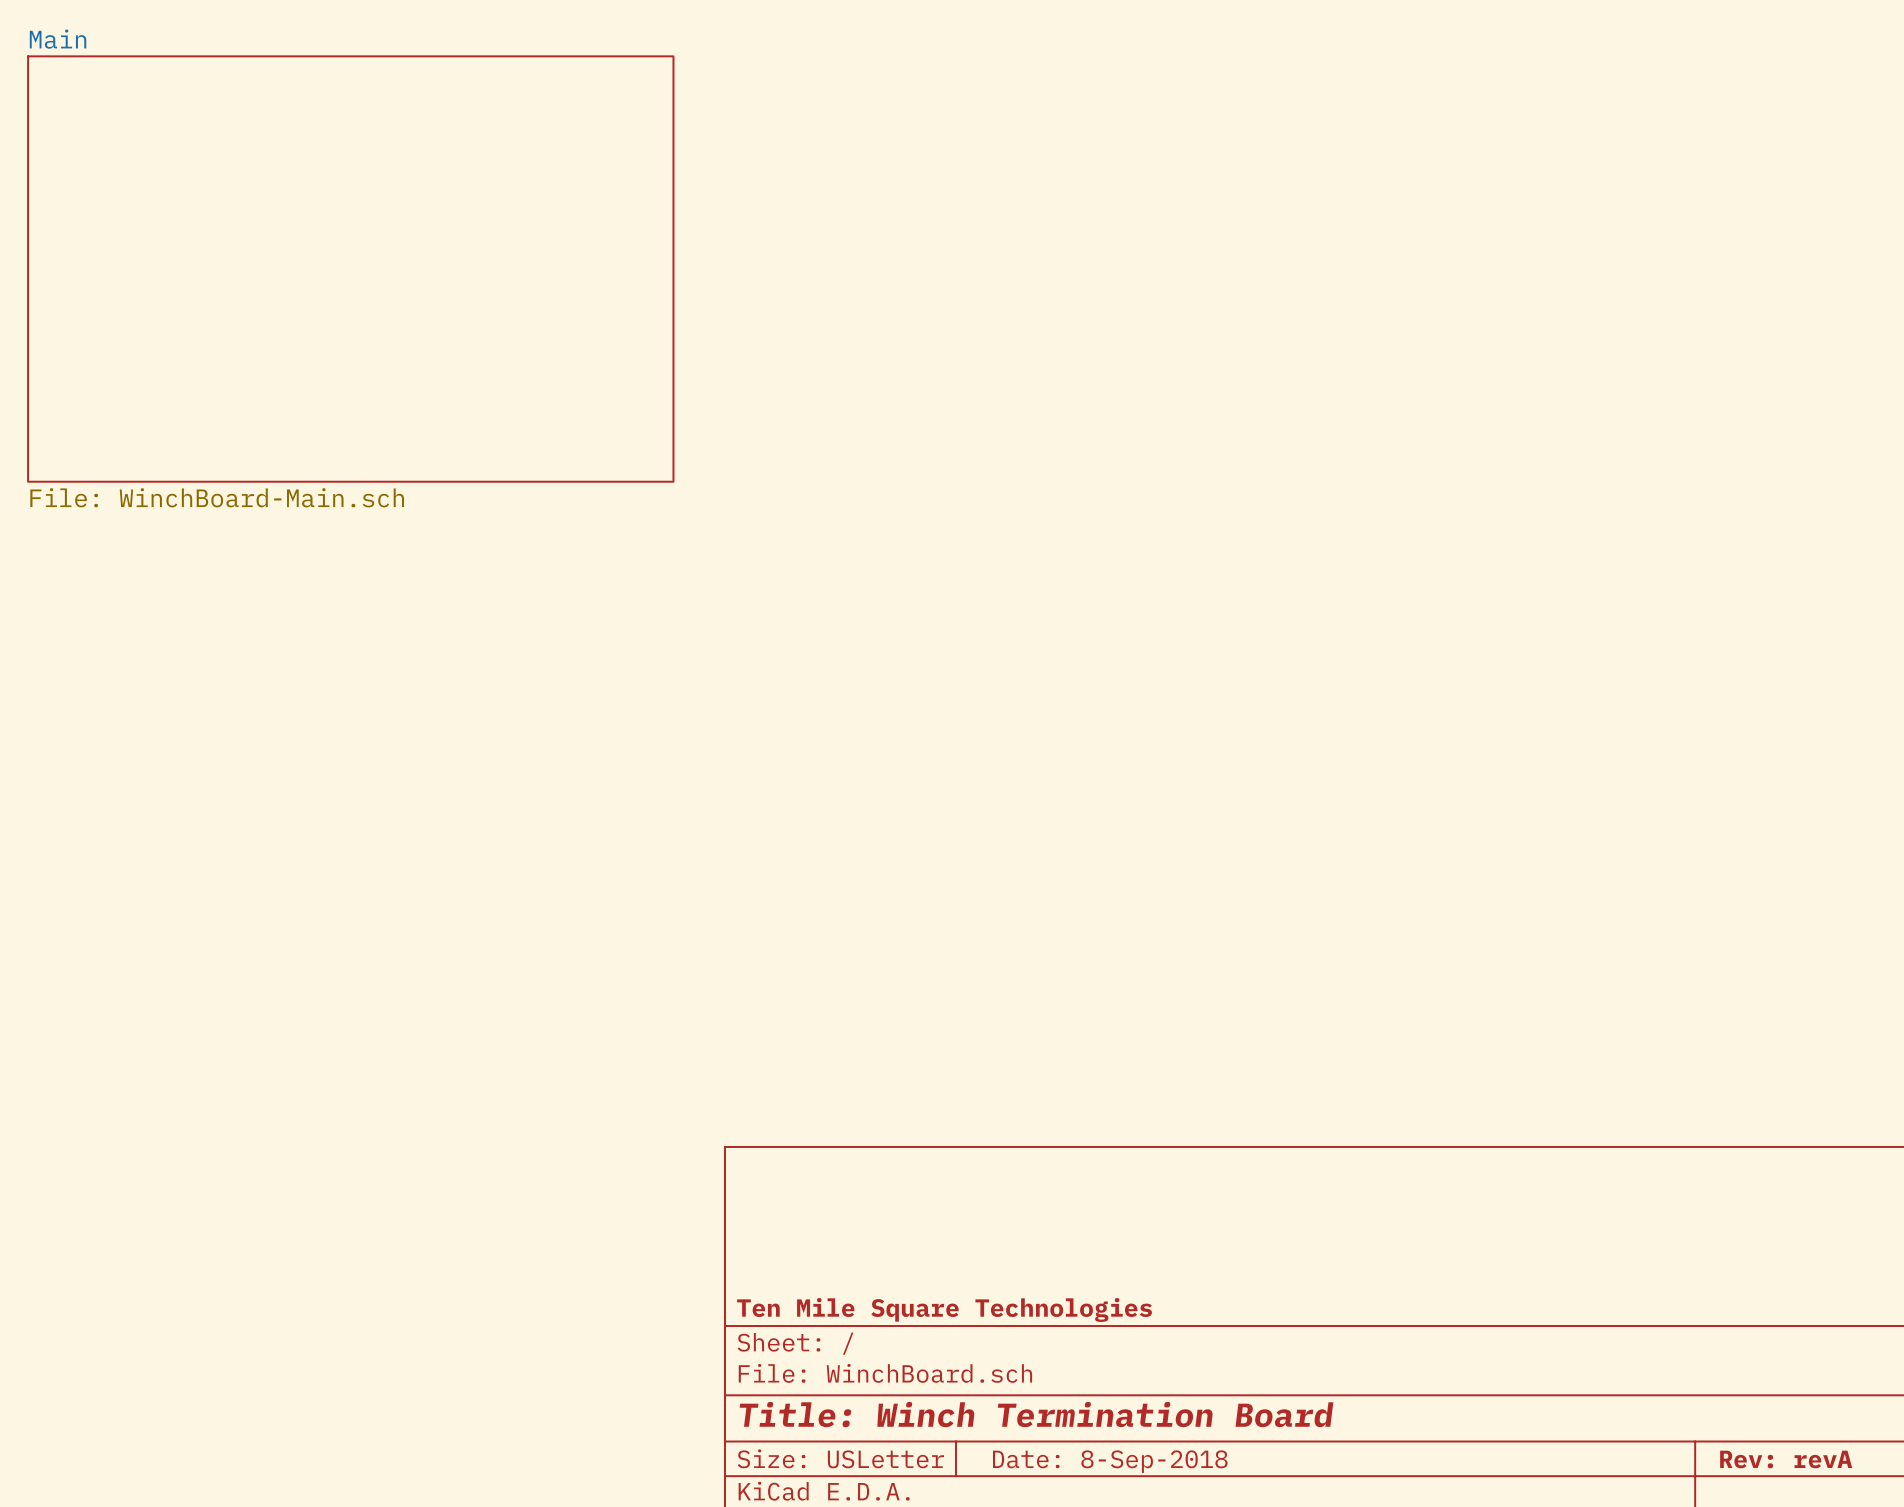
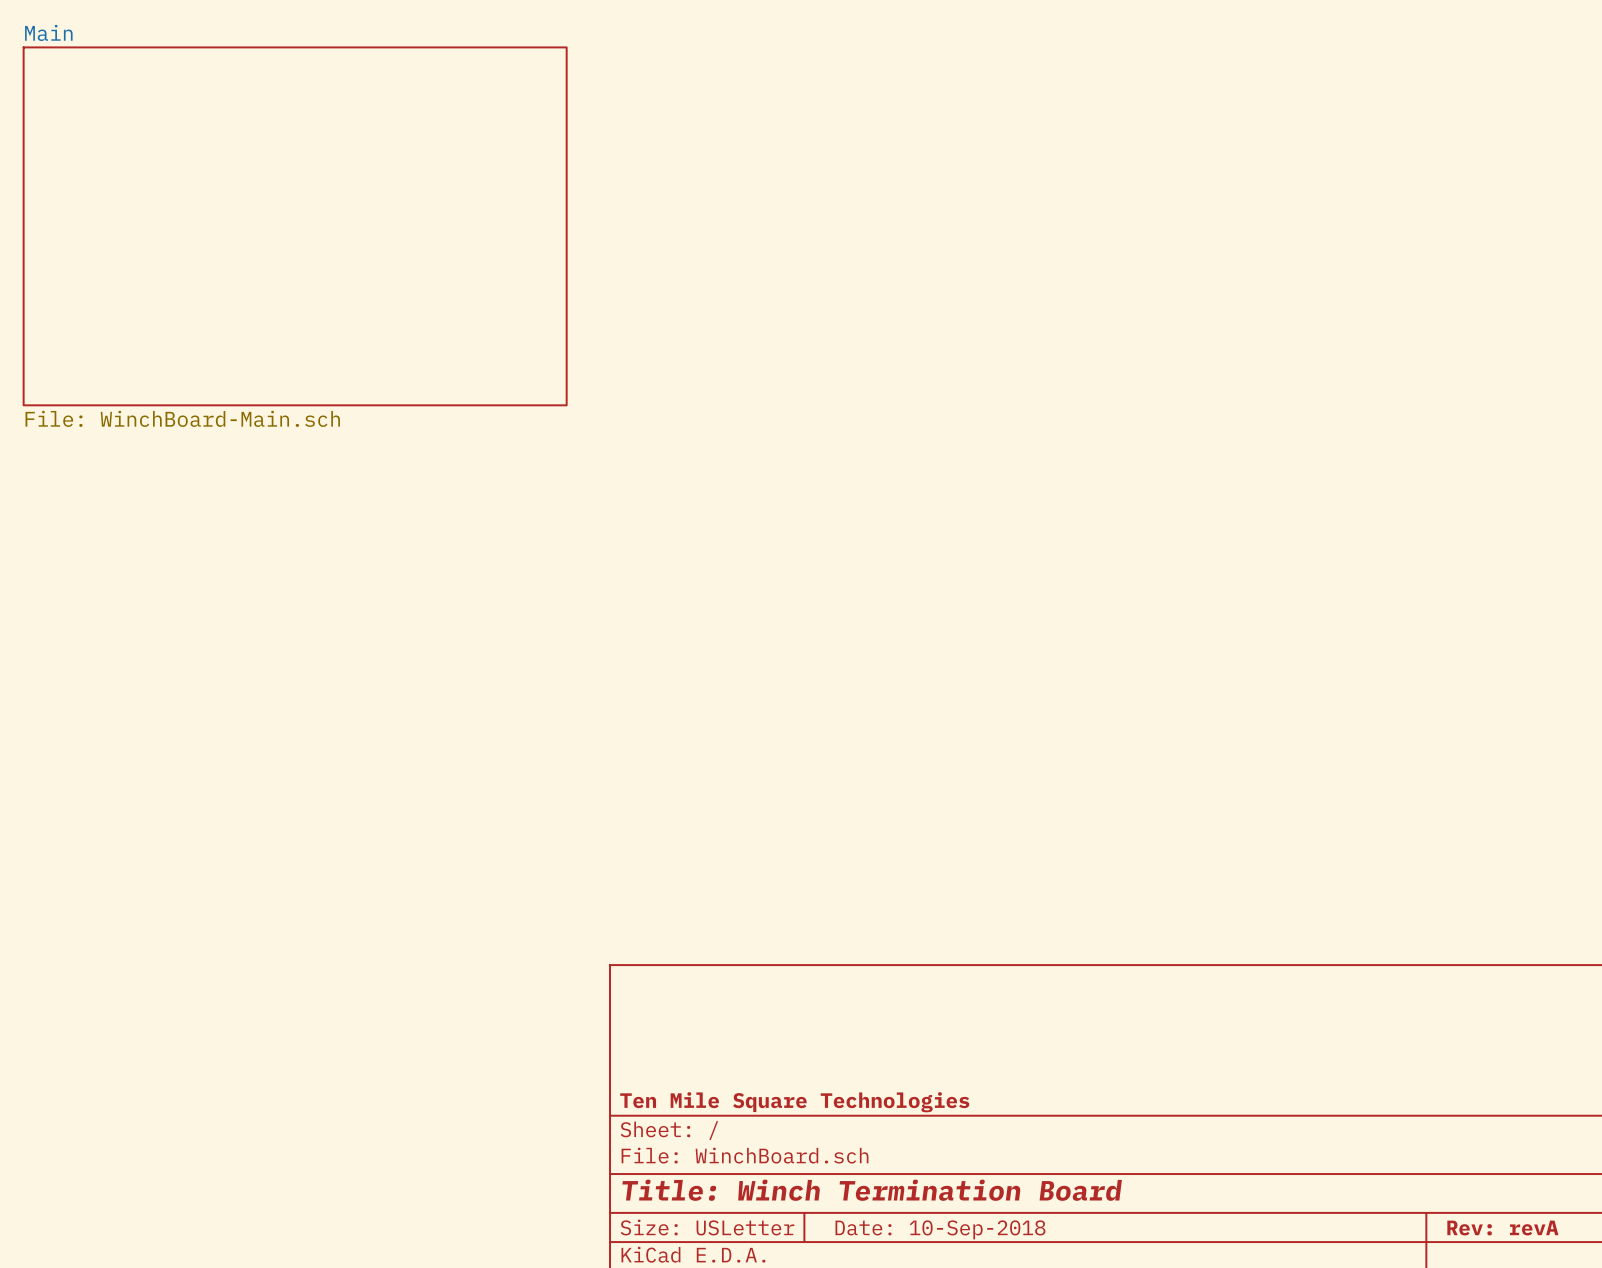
title block: Date: 8-Sep-2018 (1110, 1461) -> Date: 10-Sep-2018 (940, 1229)

